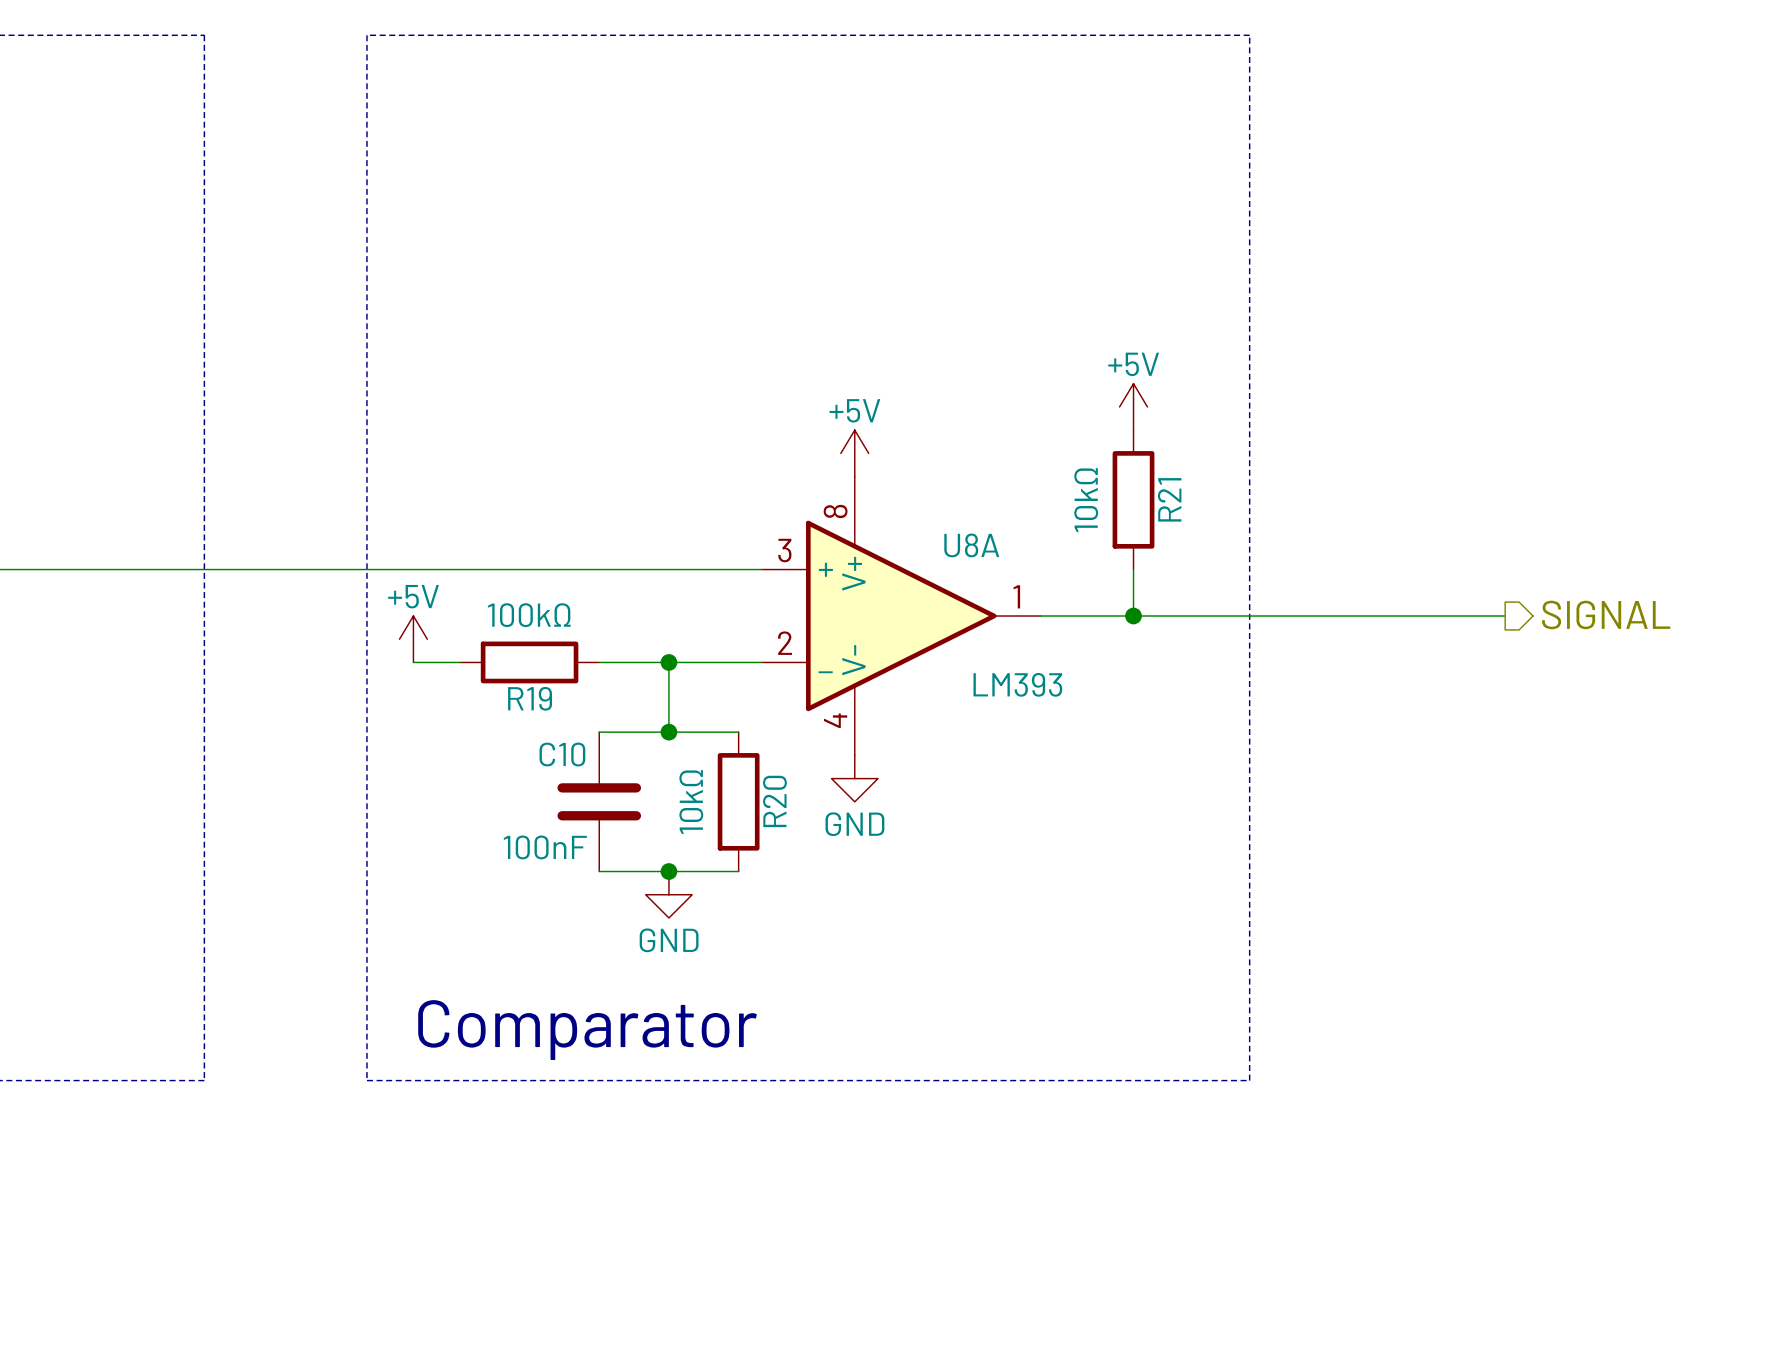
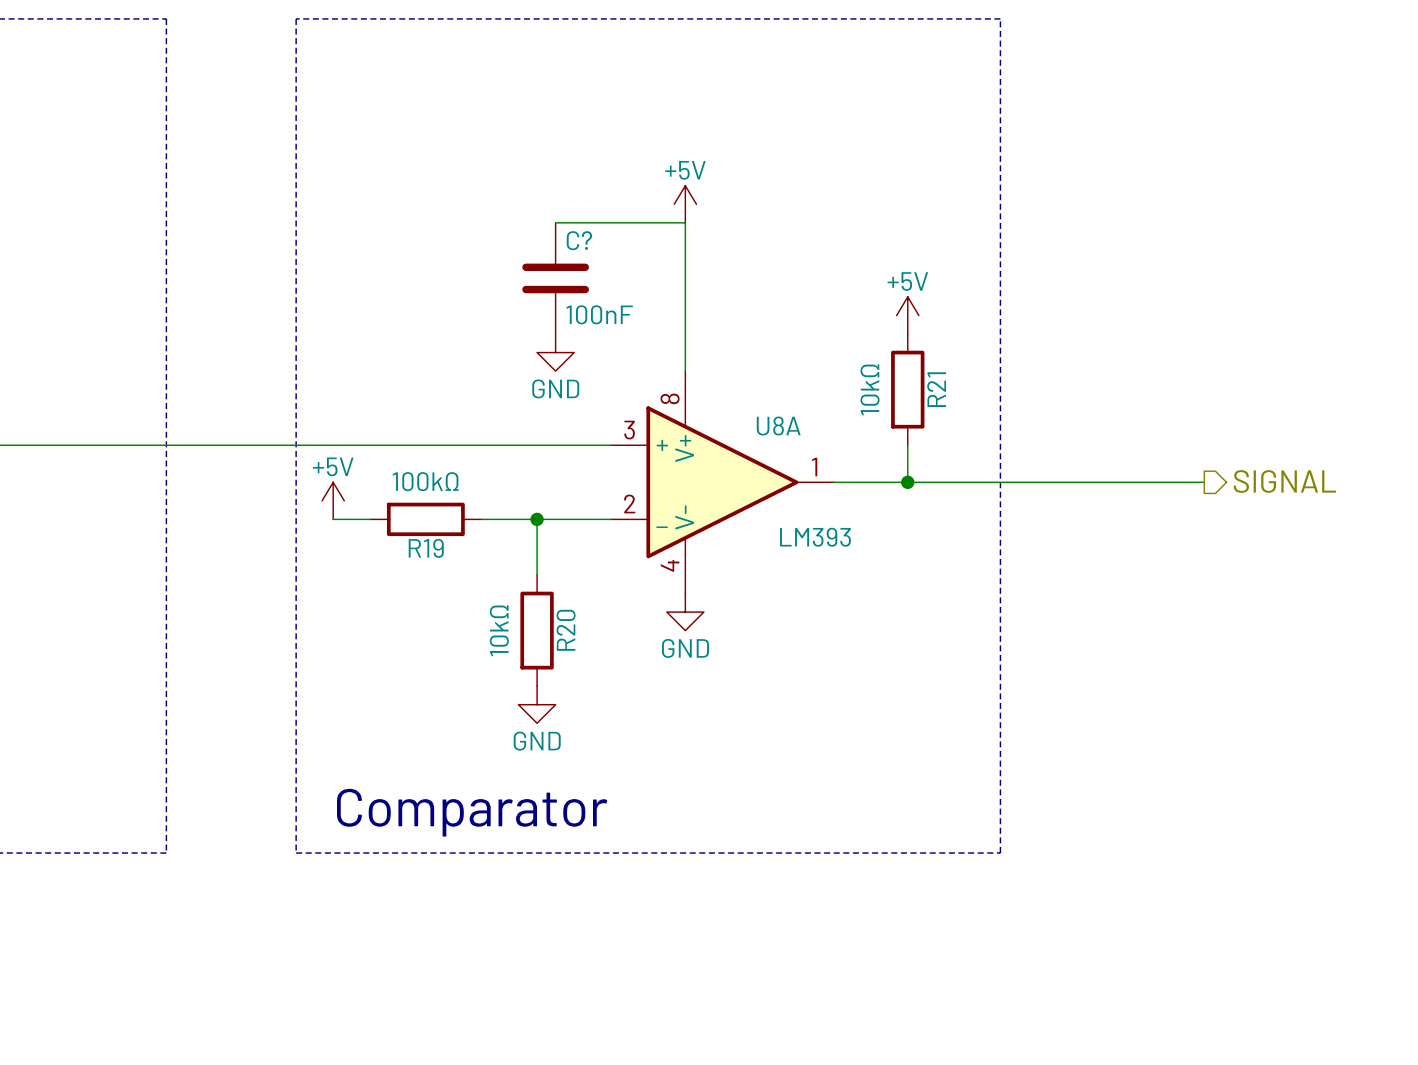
wire: none -> (555, 222) (685, 222) (685, 371)
C?: none -> 100nF (555, 278)
power symbol: none -> GND (555, 352)
power symbol position: +5V (854, 453) -> +5V (685, 204)
wire: (599, 732) (738, 732) -> none
junction: (668, 732) -> none
C10: 100nF (599, 801) -> none
R20 position: (738, 801) -> (537, 630)
wire: (599, 871) (738, 871) -> none
junction: (668, 871) -> none

